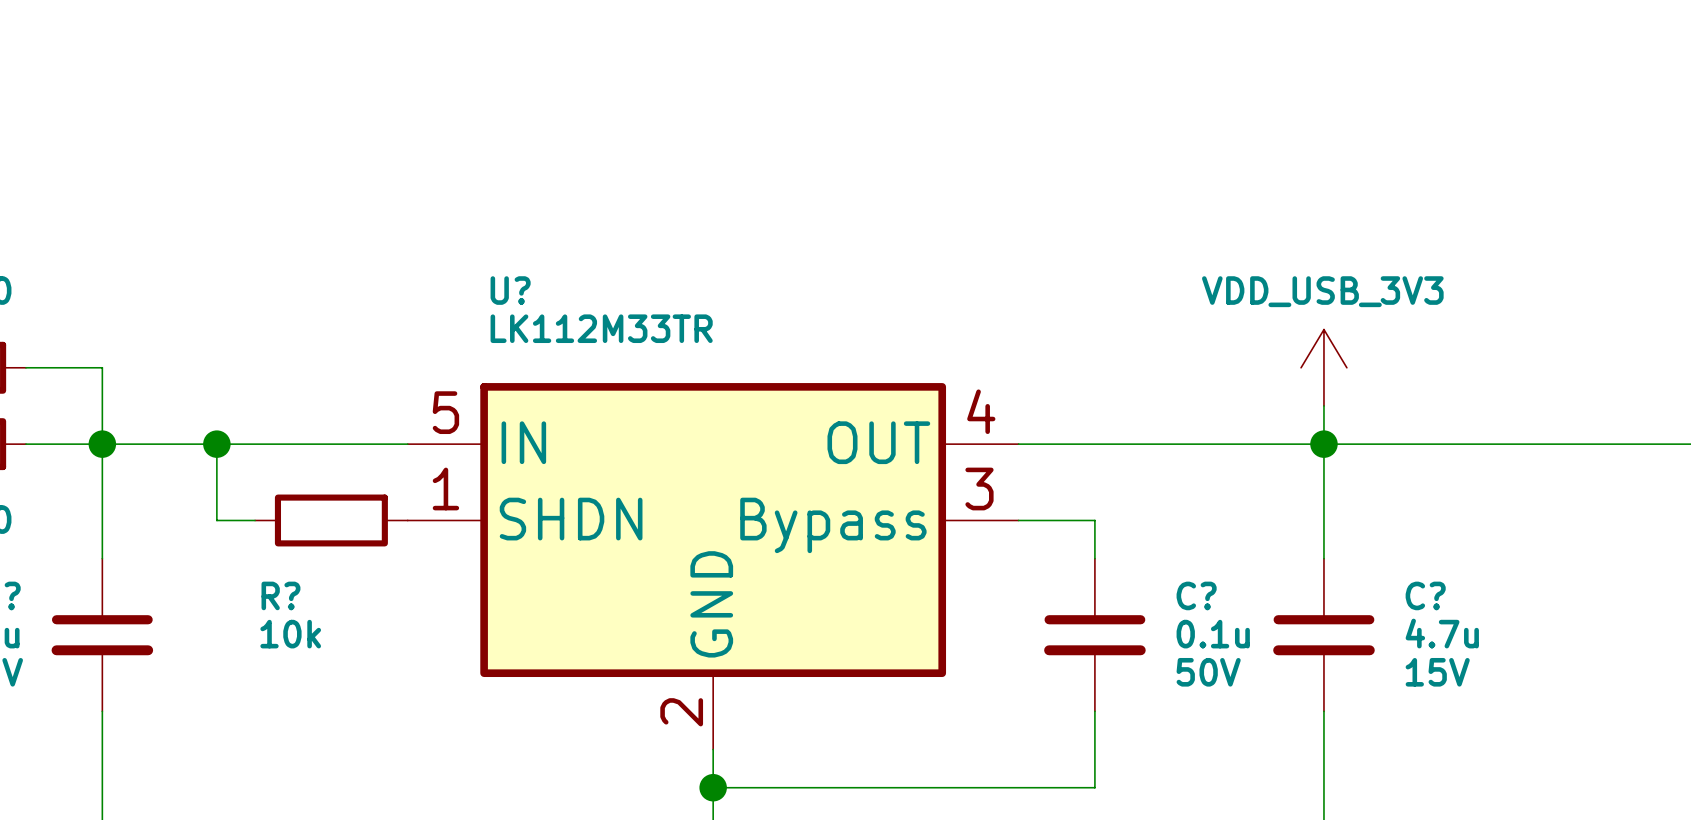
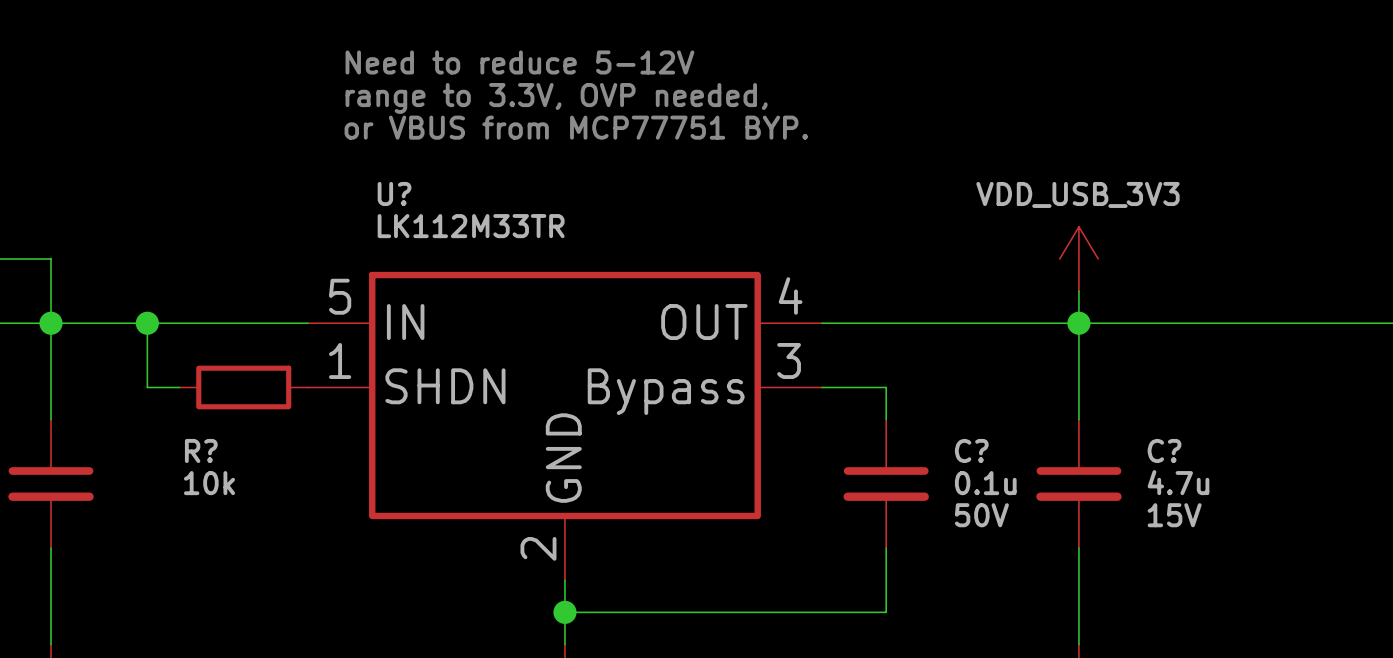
text: none -> Need to reduce 5-12V (519, 62)
text: none -> range to 3.3V, OVP needed, (556, 98)
text: none -> or VBUS from MCP77751 BYP. (576, 127)

